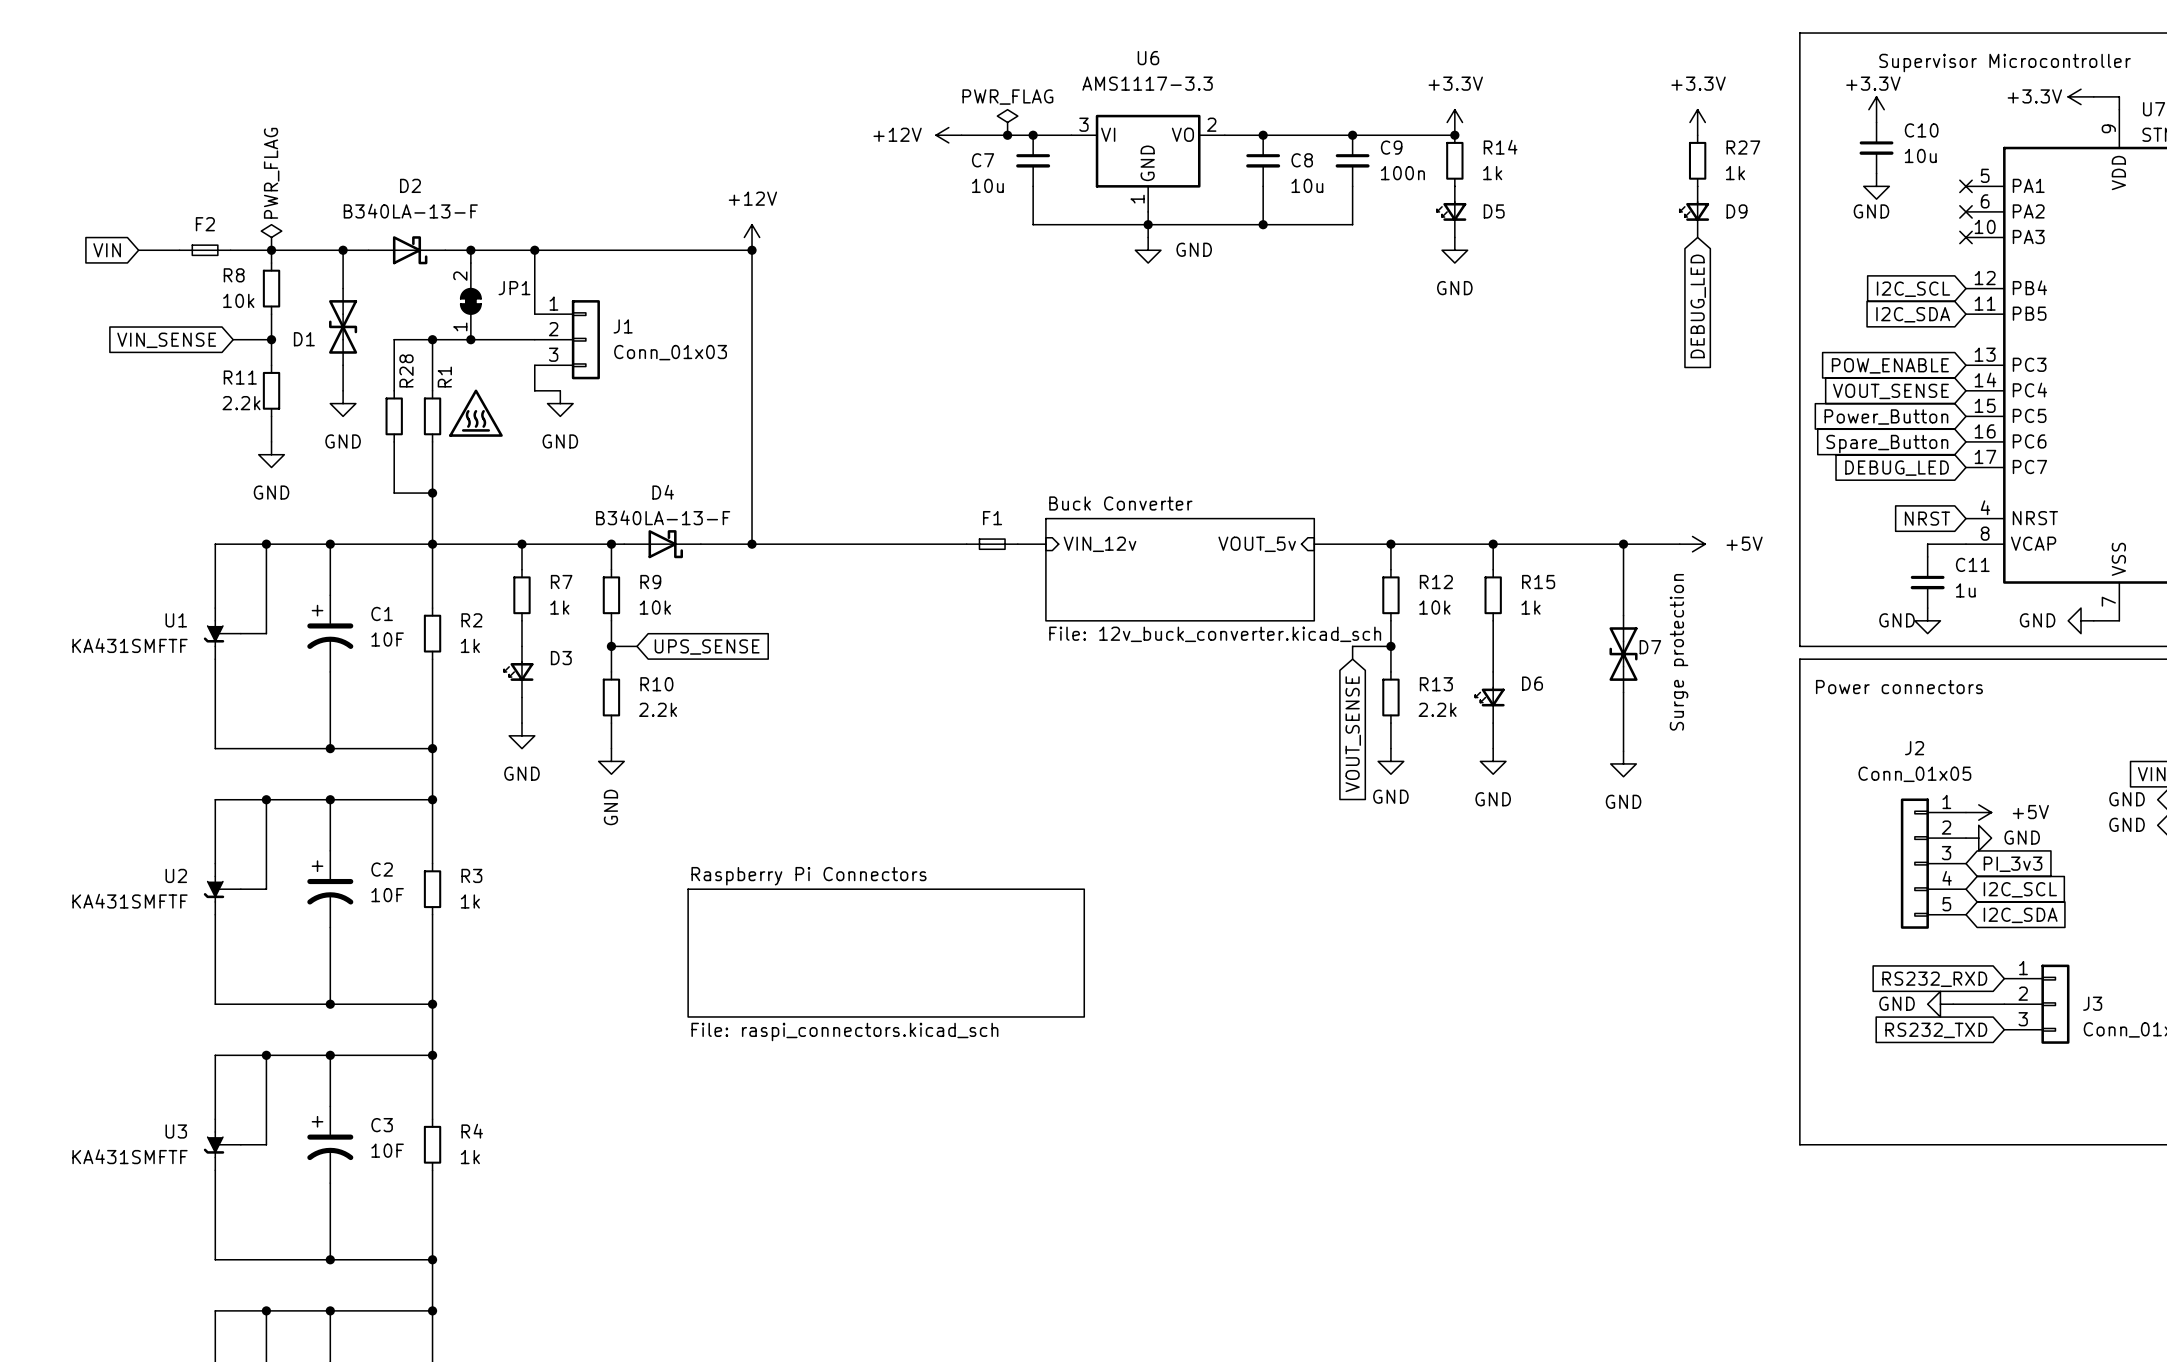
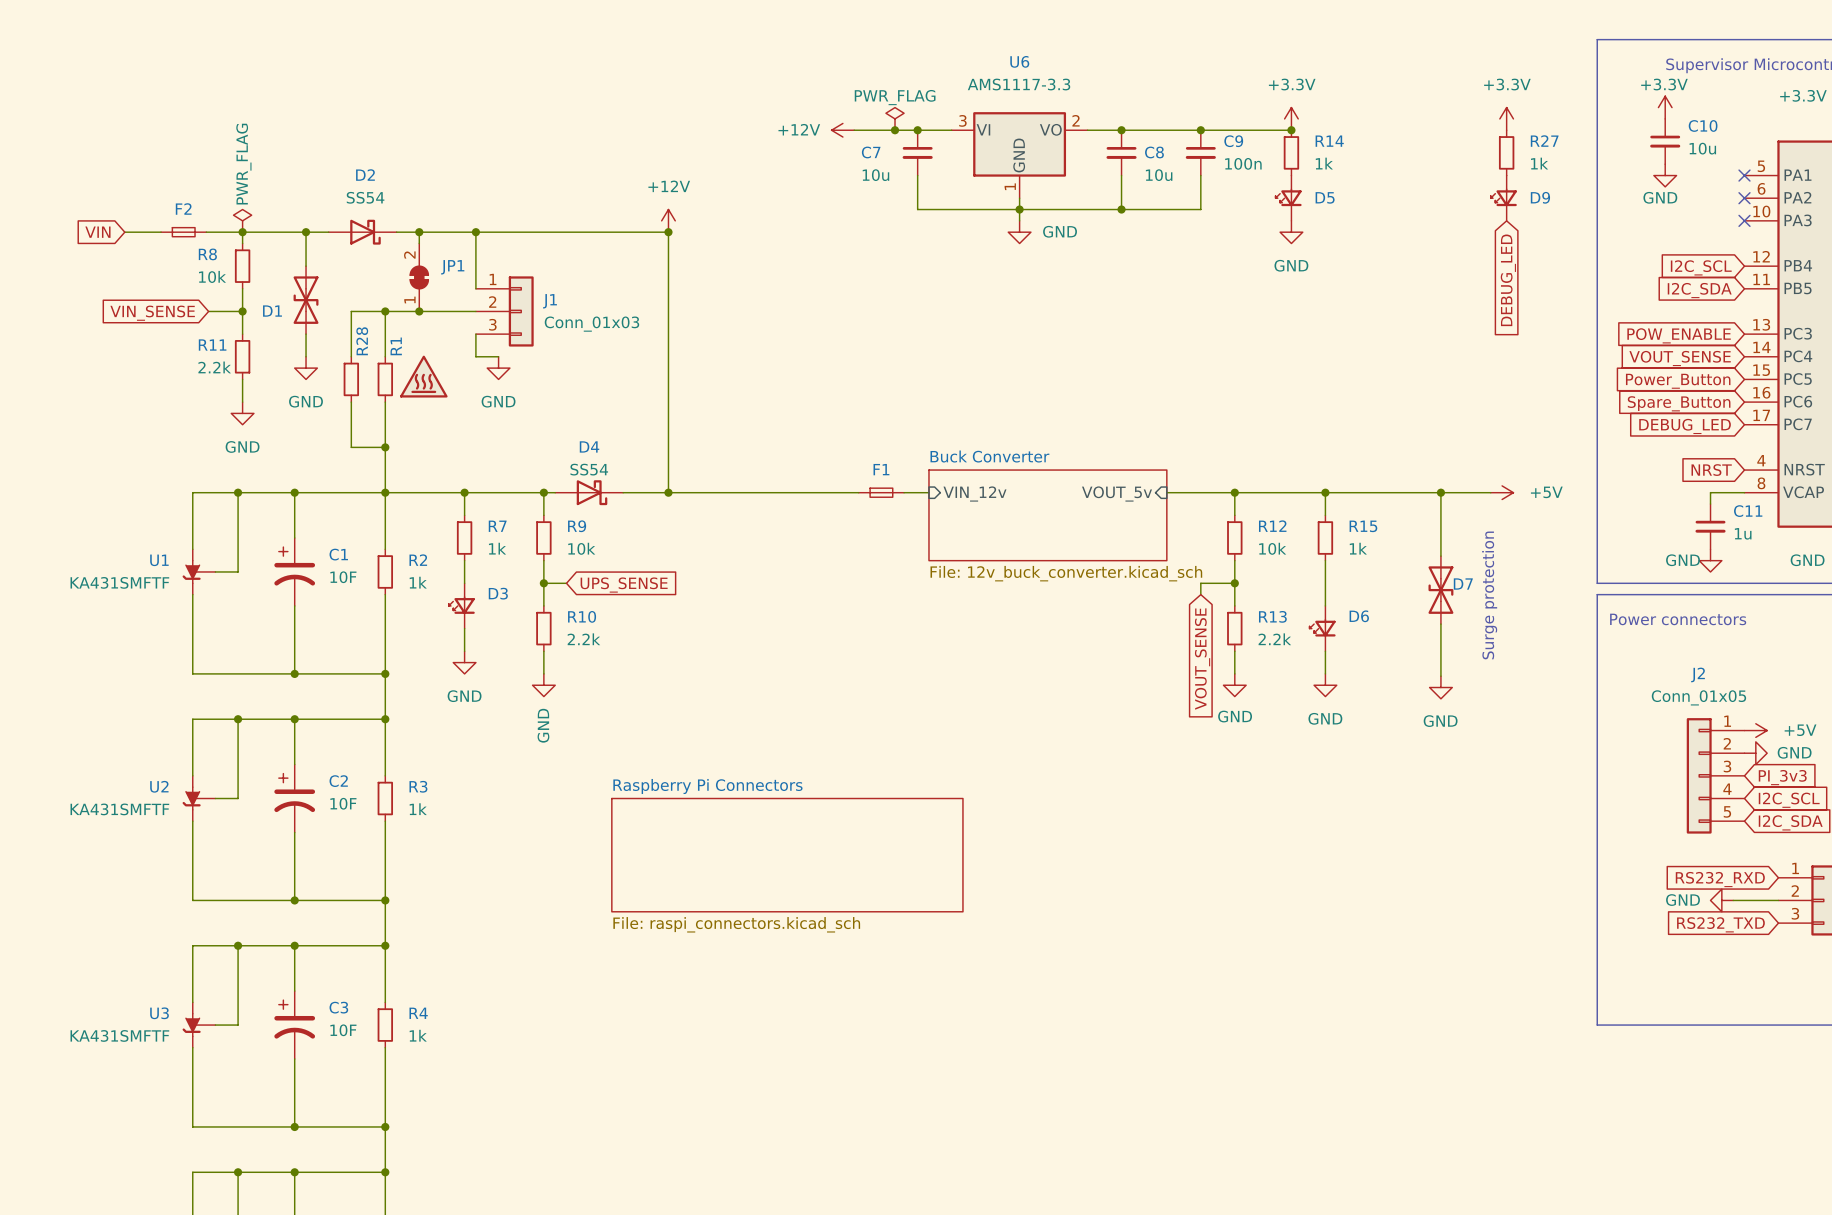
D2 value: B340LA-13-F (410, 211) -> SS54 (365, 197)
D4 value: B340LA-13-F (663, 517) -> SS54 (589, 469)

